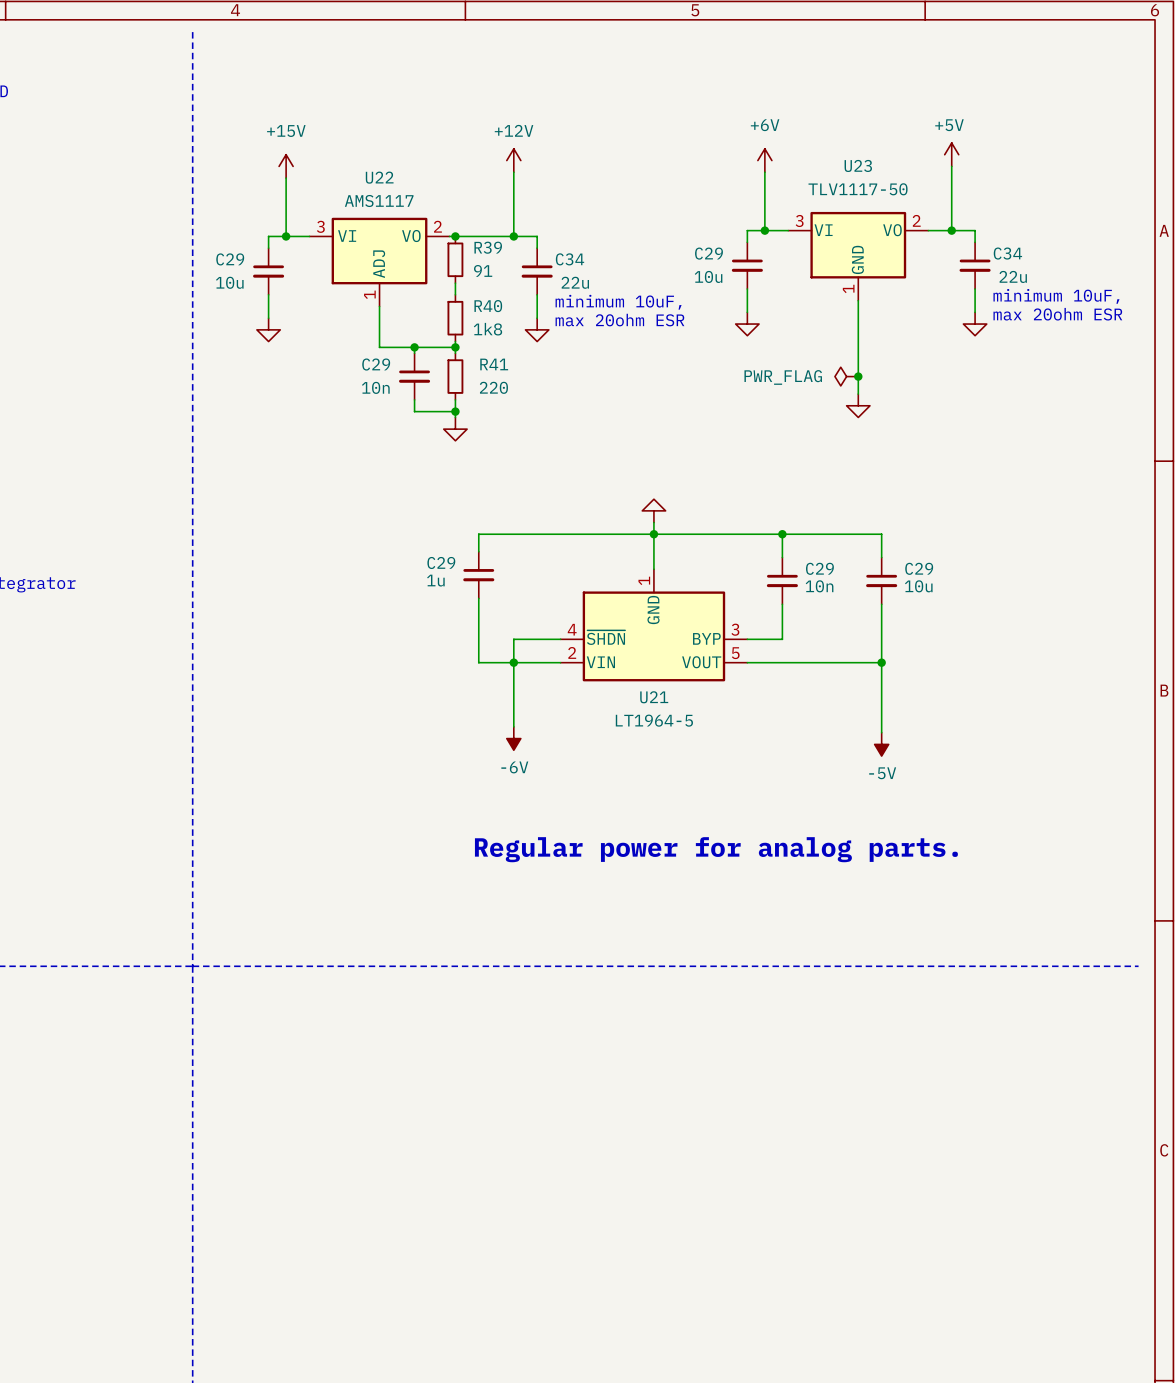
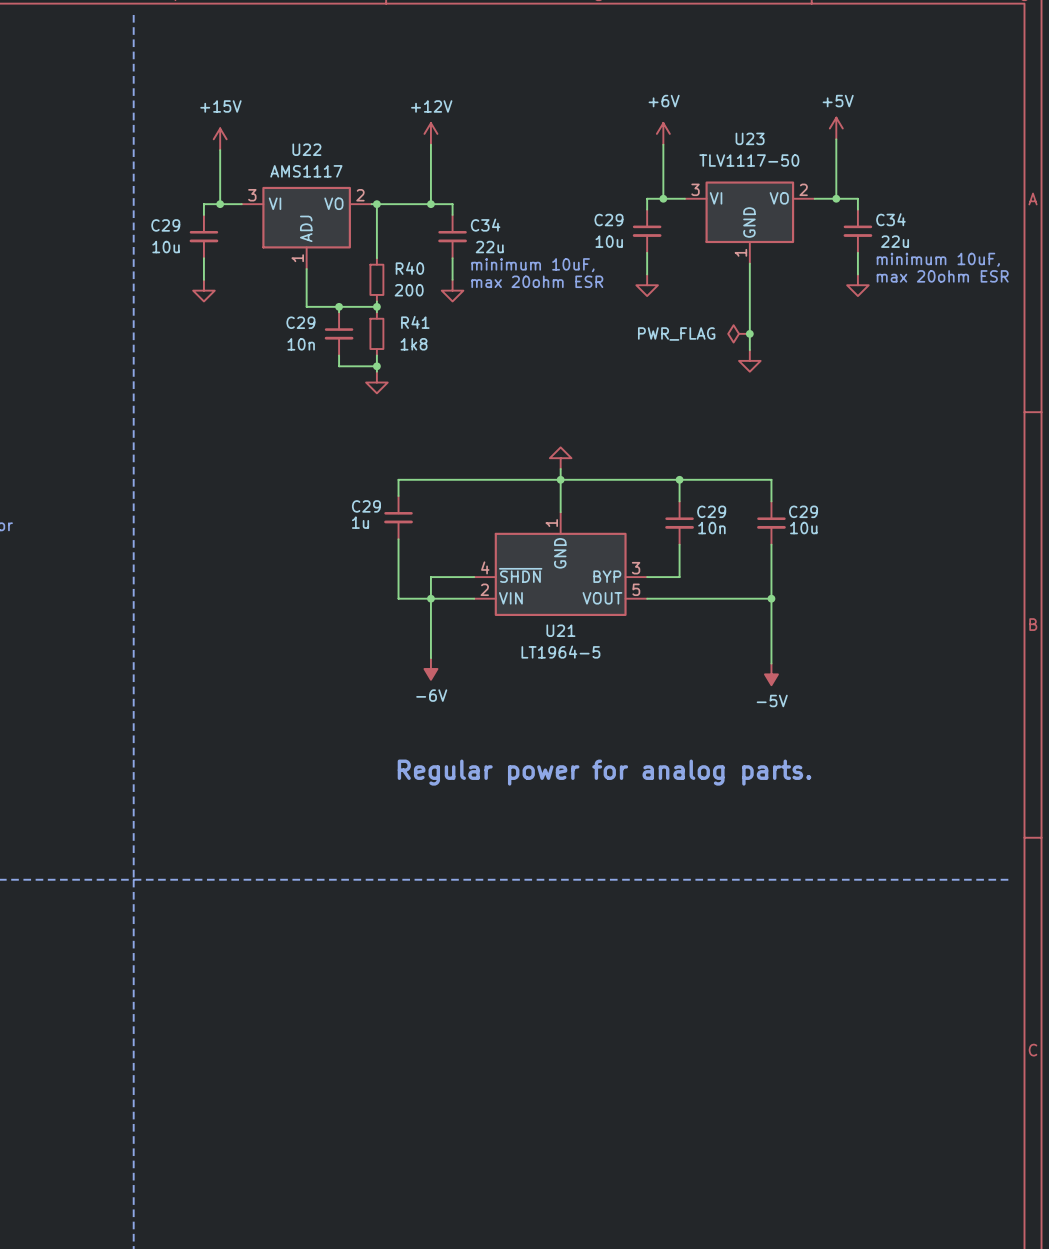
wire: none -> (376, 204) (376, 247)
R39: 91 (455, 259) -> none
R40 value: 1k8 (487, 329) -> 200 (409, 290)
R41 value: 220 (493, 387) -> 1k8 (414, 344)

